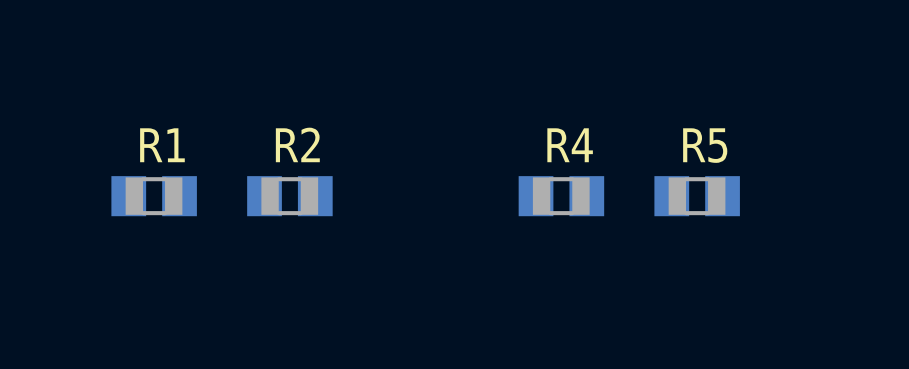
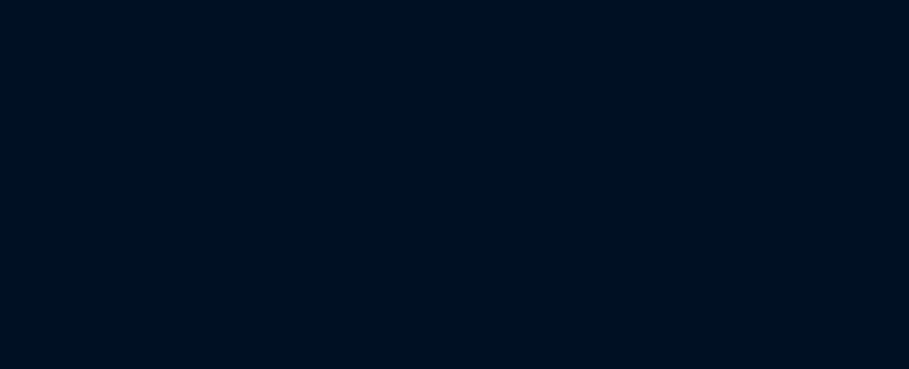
R1: (154, 196) -> none
R2: (289, 196) -> none
R4: (561, 196) -> none
R5: (697, 196) -> none

